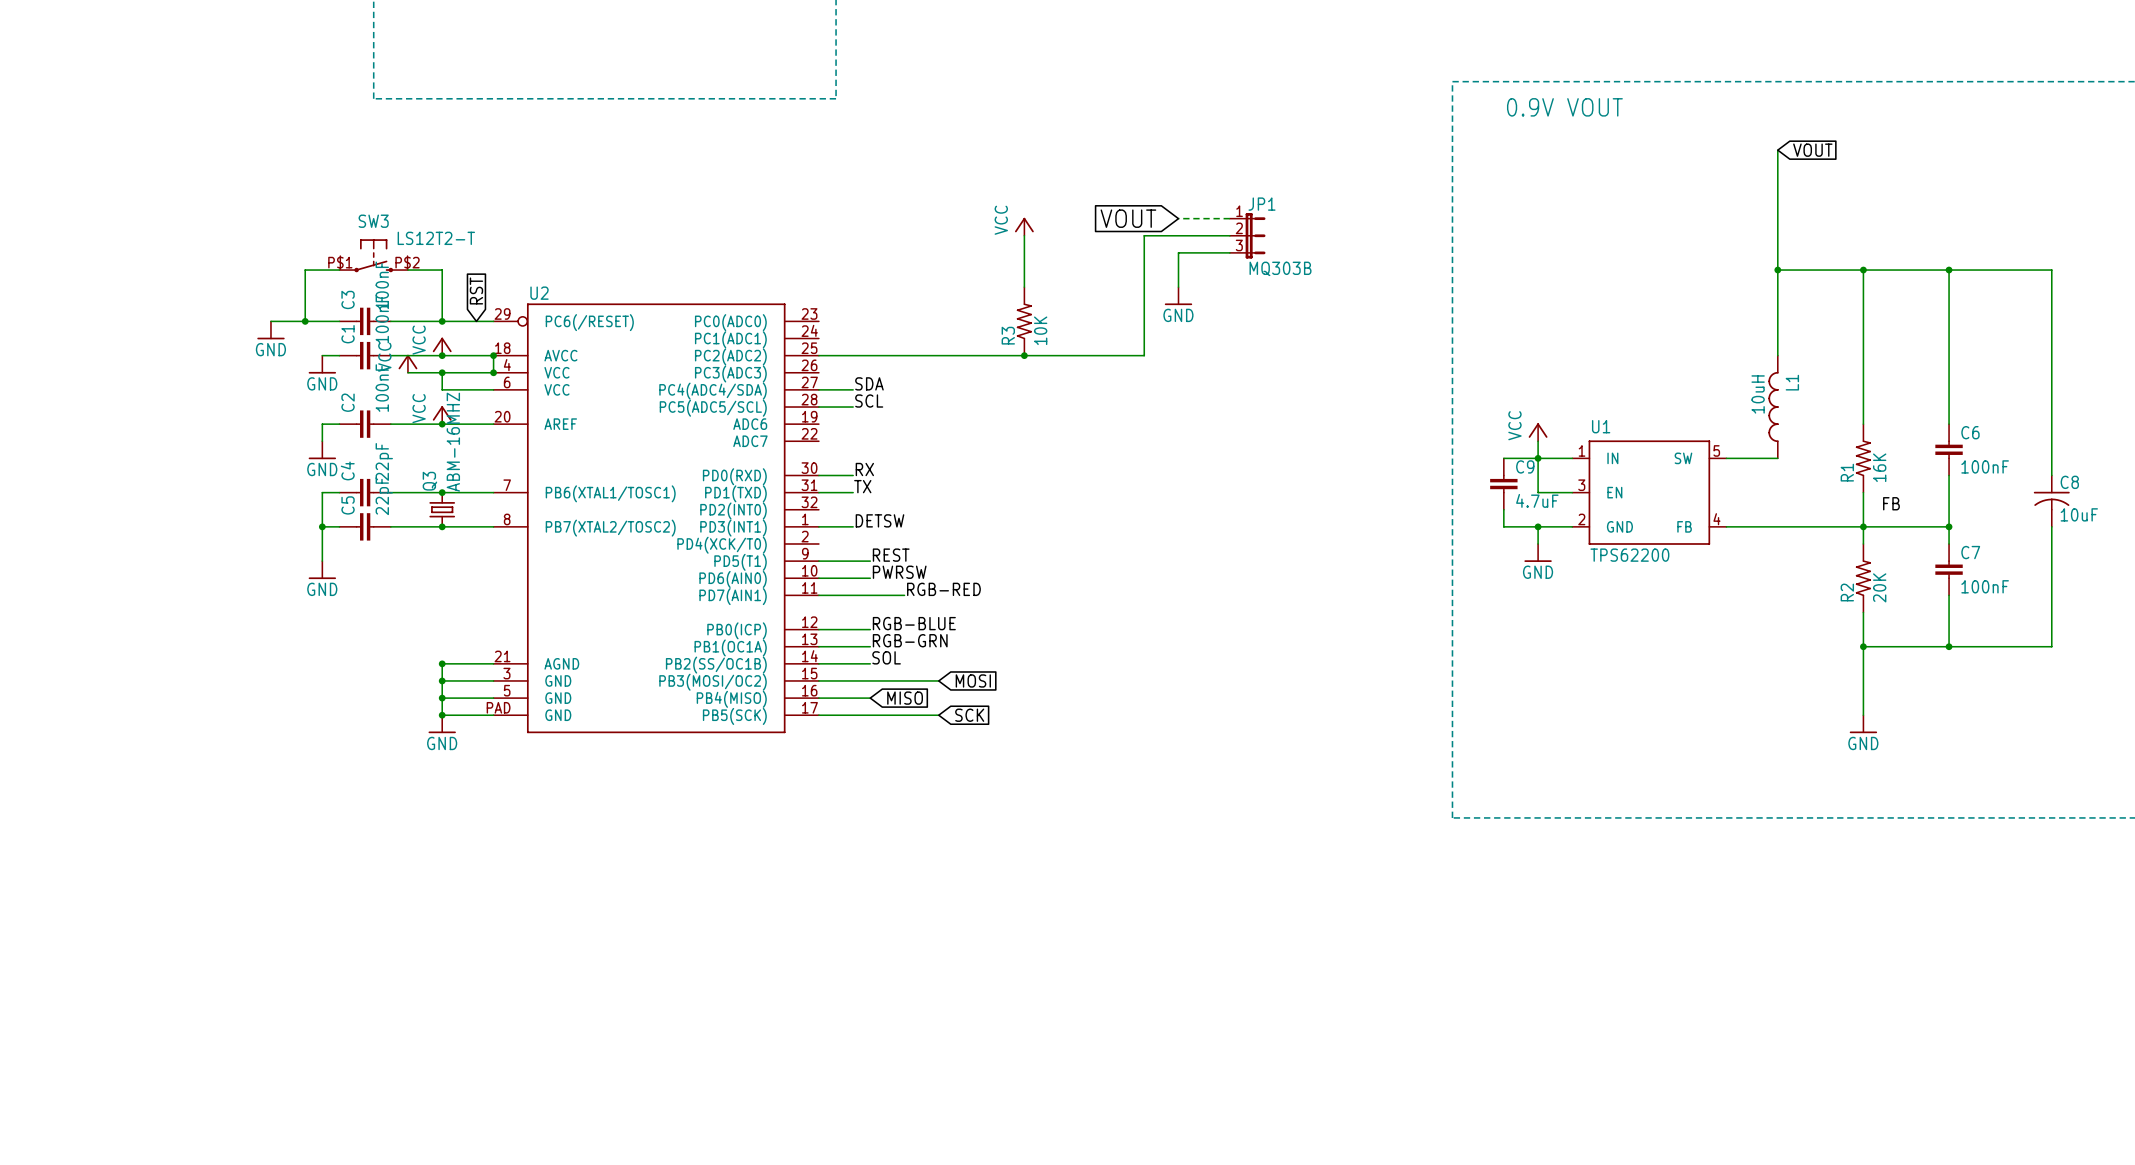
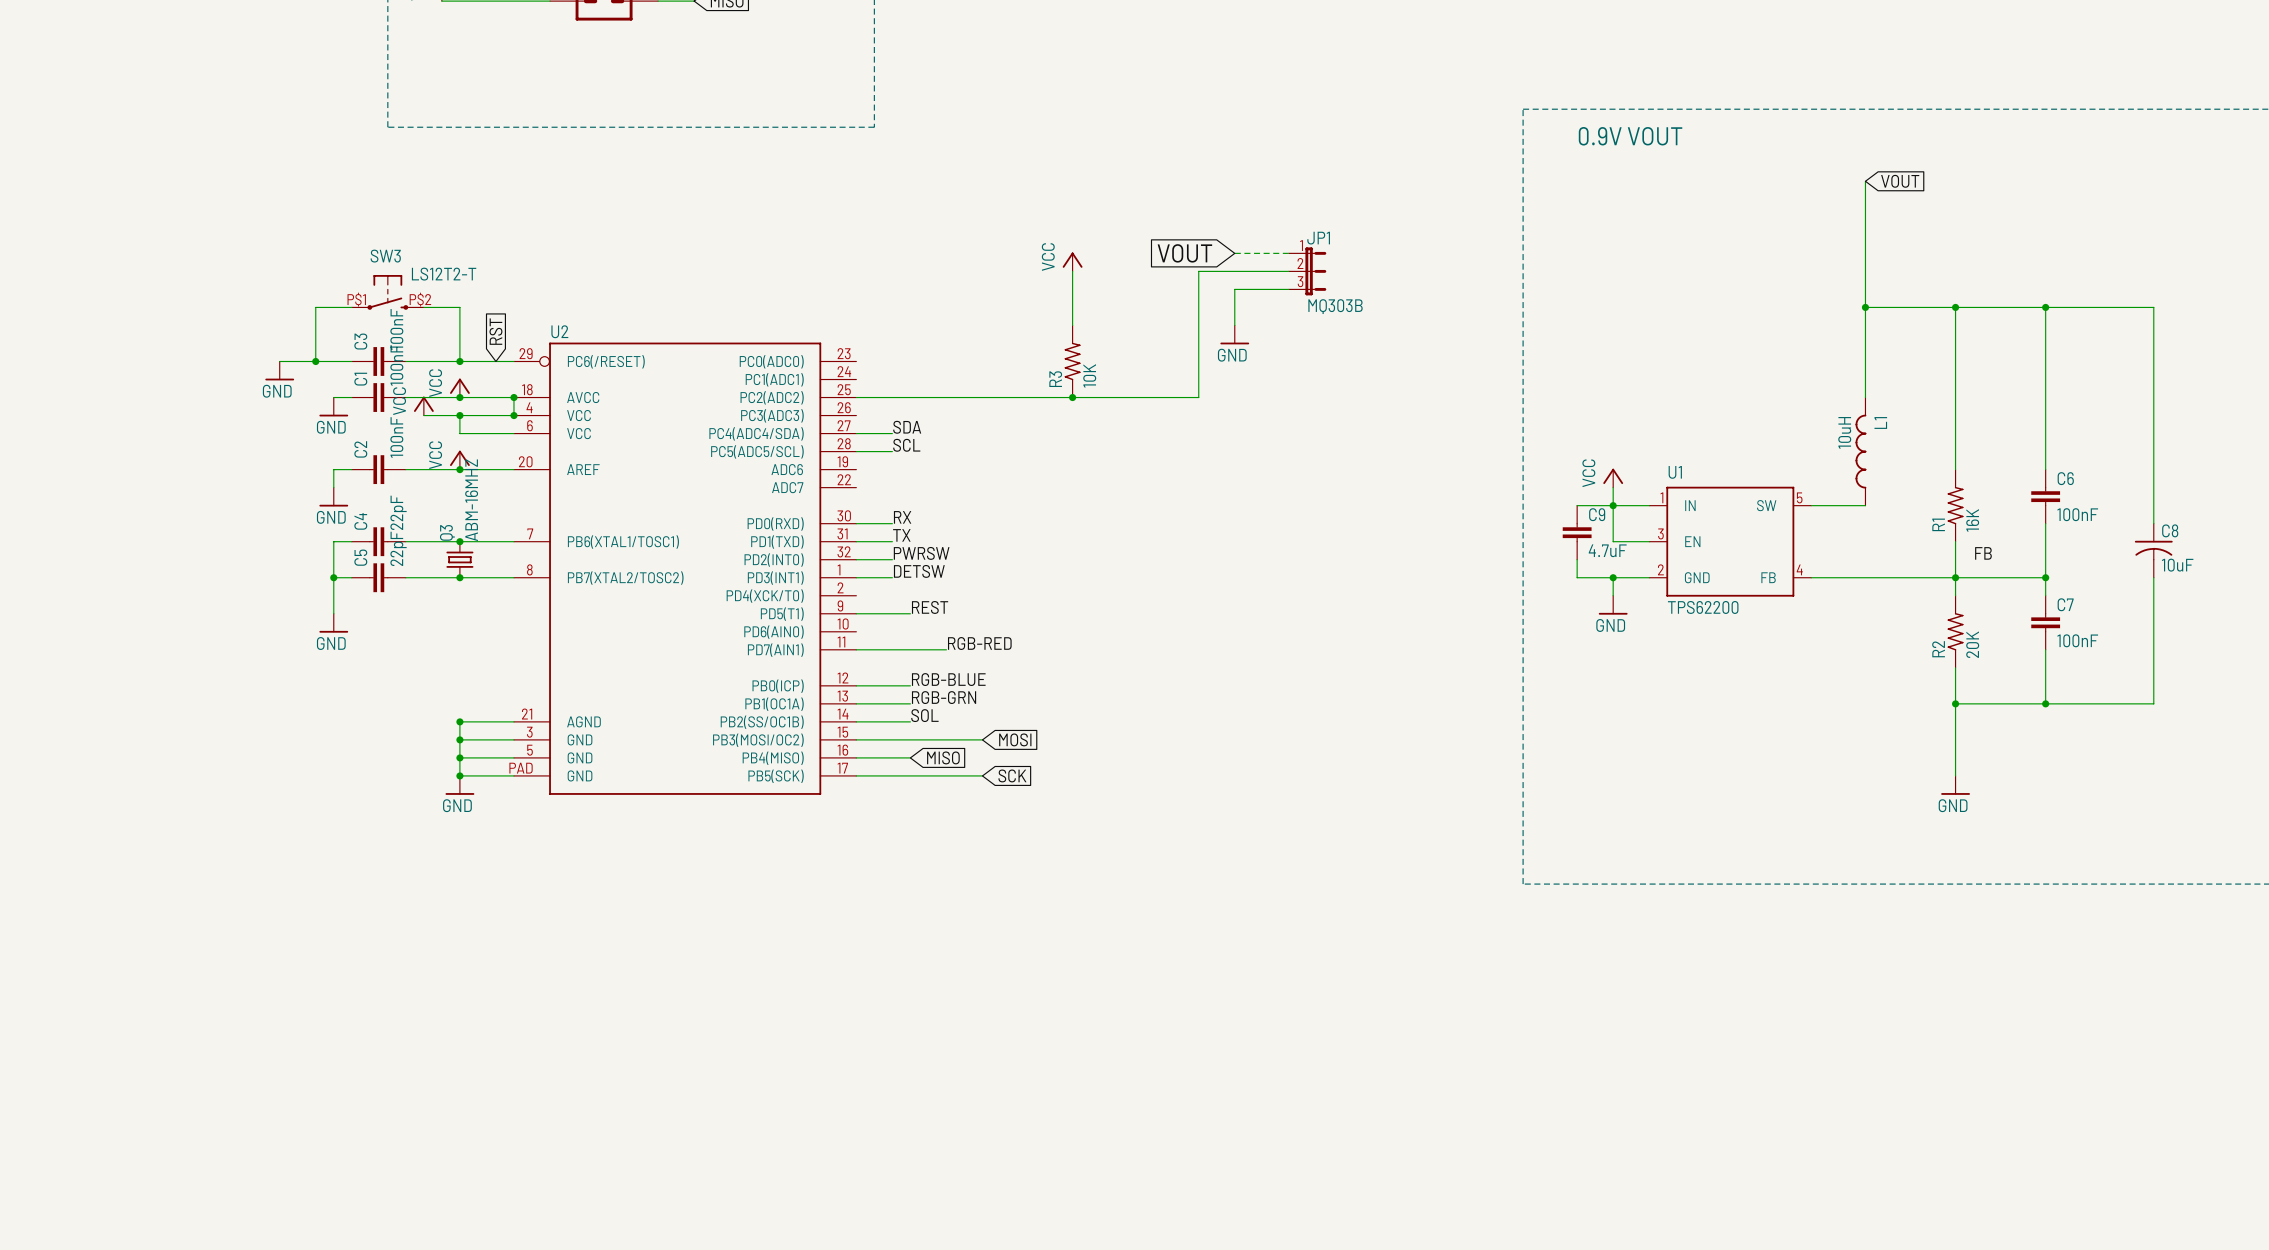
wire: none -> (856, 559) (892, 559)
label position: PWRSW (899, 572) -> PWRSW (921, 553)
wire: (818, 578) (870, 578) -> none

